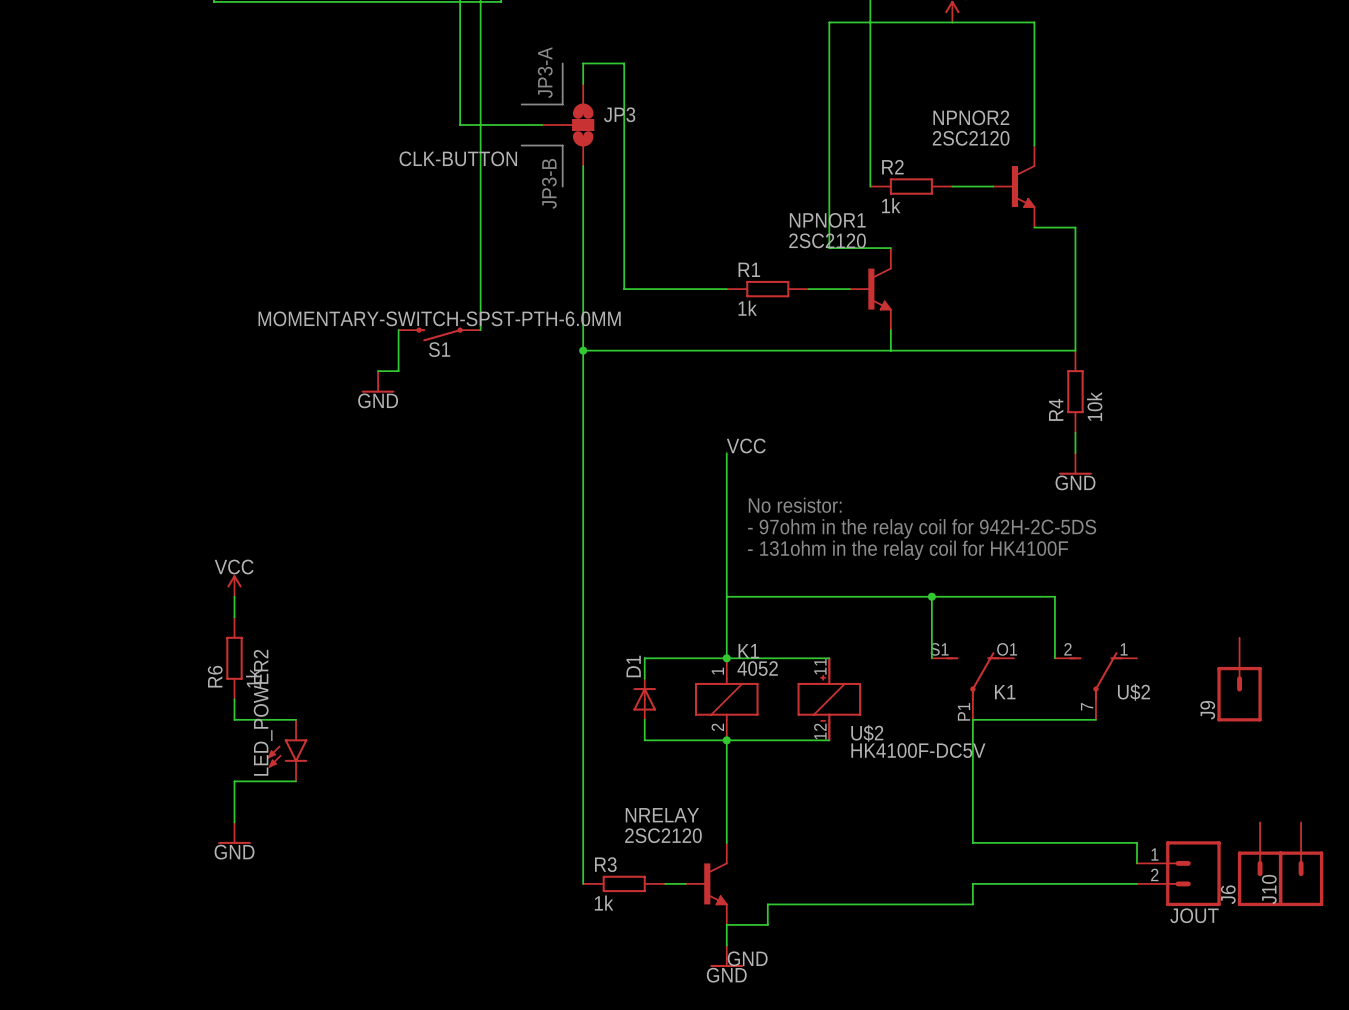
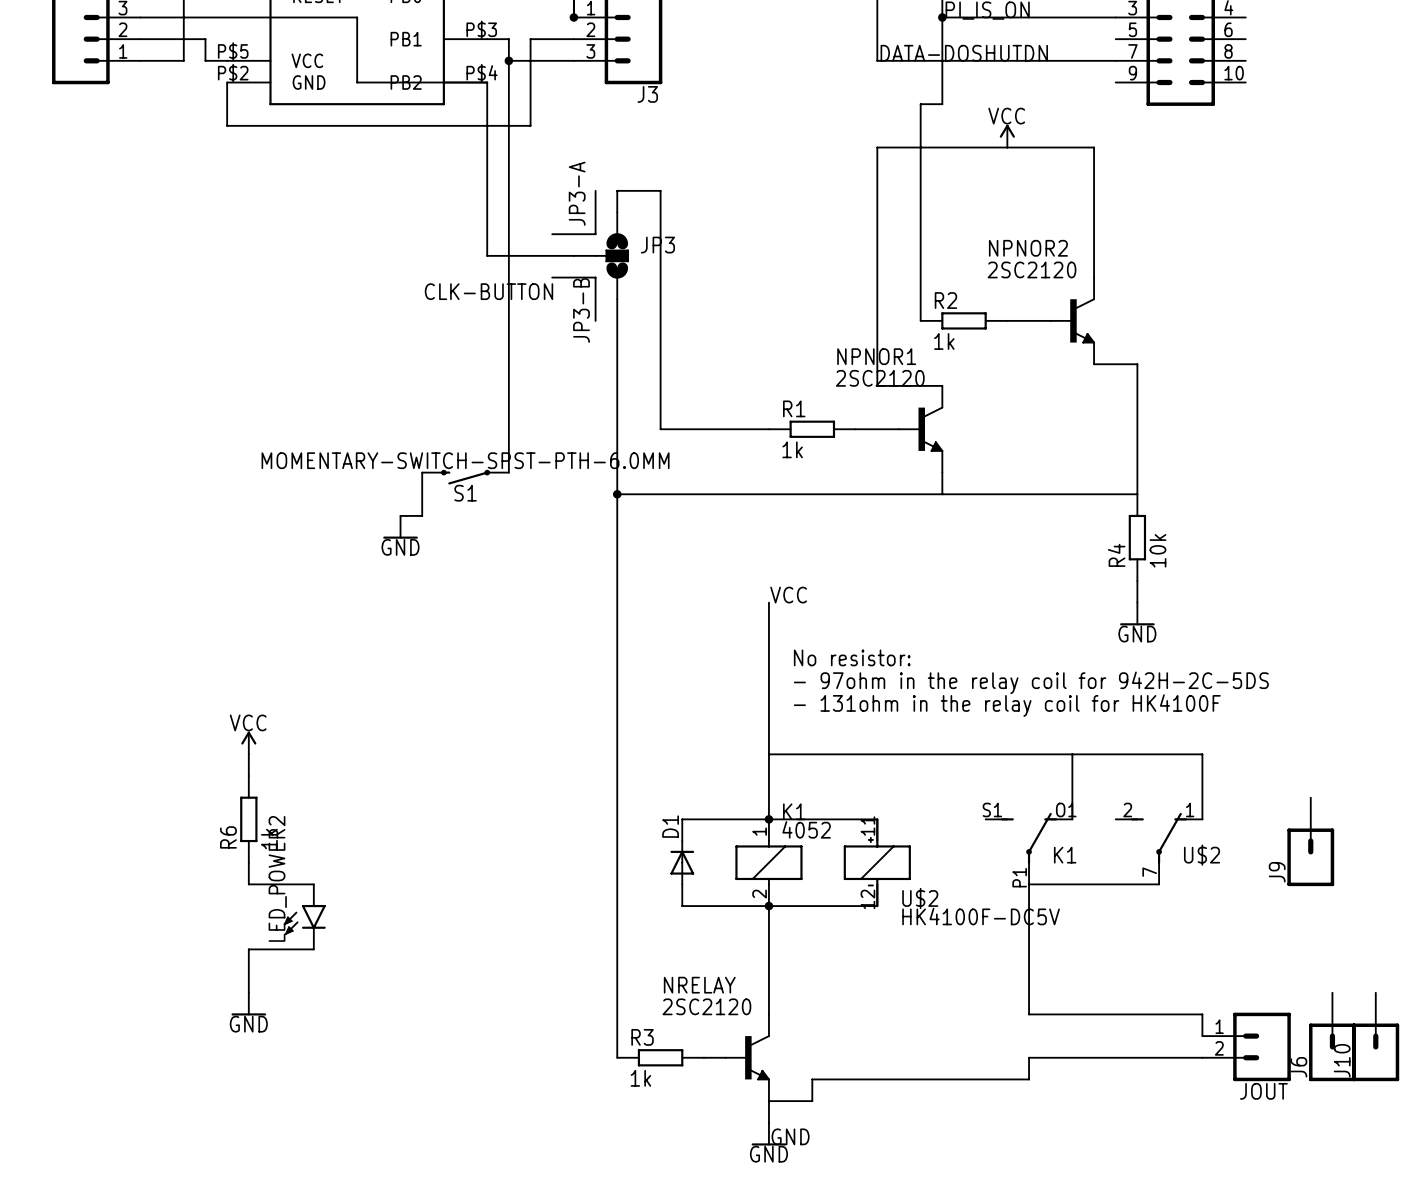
wire: (931, 596) (931, 658) -> (1072, 754) (1072, 819)
junction: (931, 596) -> none
wire: (1054, 596) (1054, 658) -> (1115, 754) (1202, 754) (1202, 819)

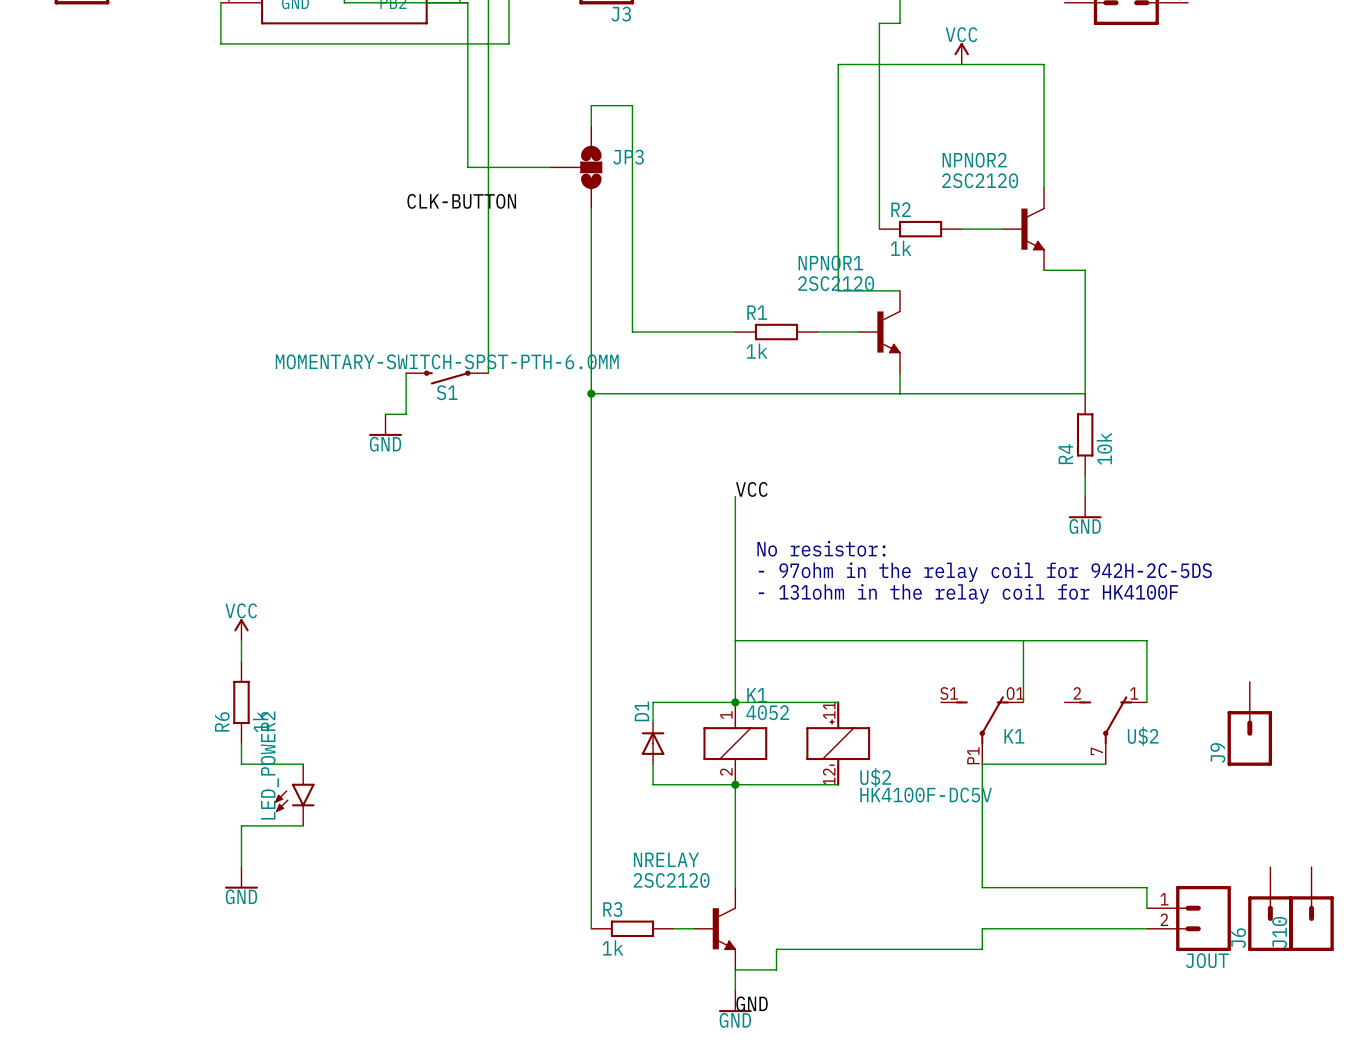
line: (595, 190) (595, 234) (552, 234) -> none
text: JP3-A (577, 193) -> none
line: (552, 277) (595, 277) (595, 320) -> none
text: JP3-B (581, 310) -> none

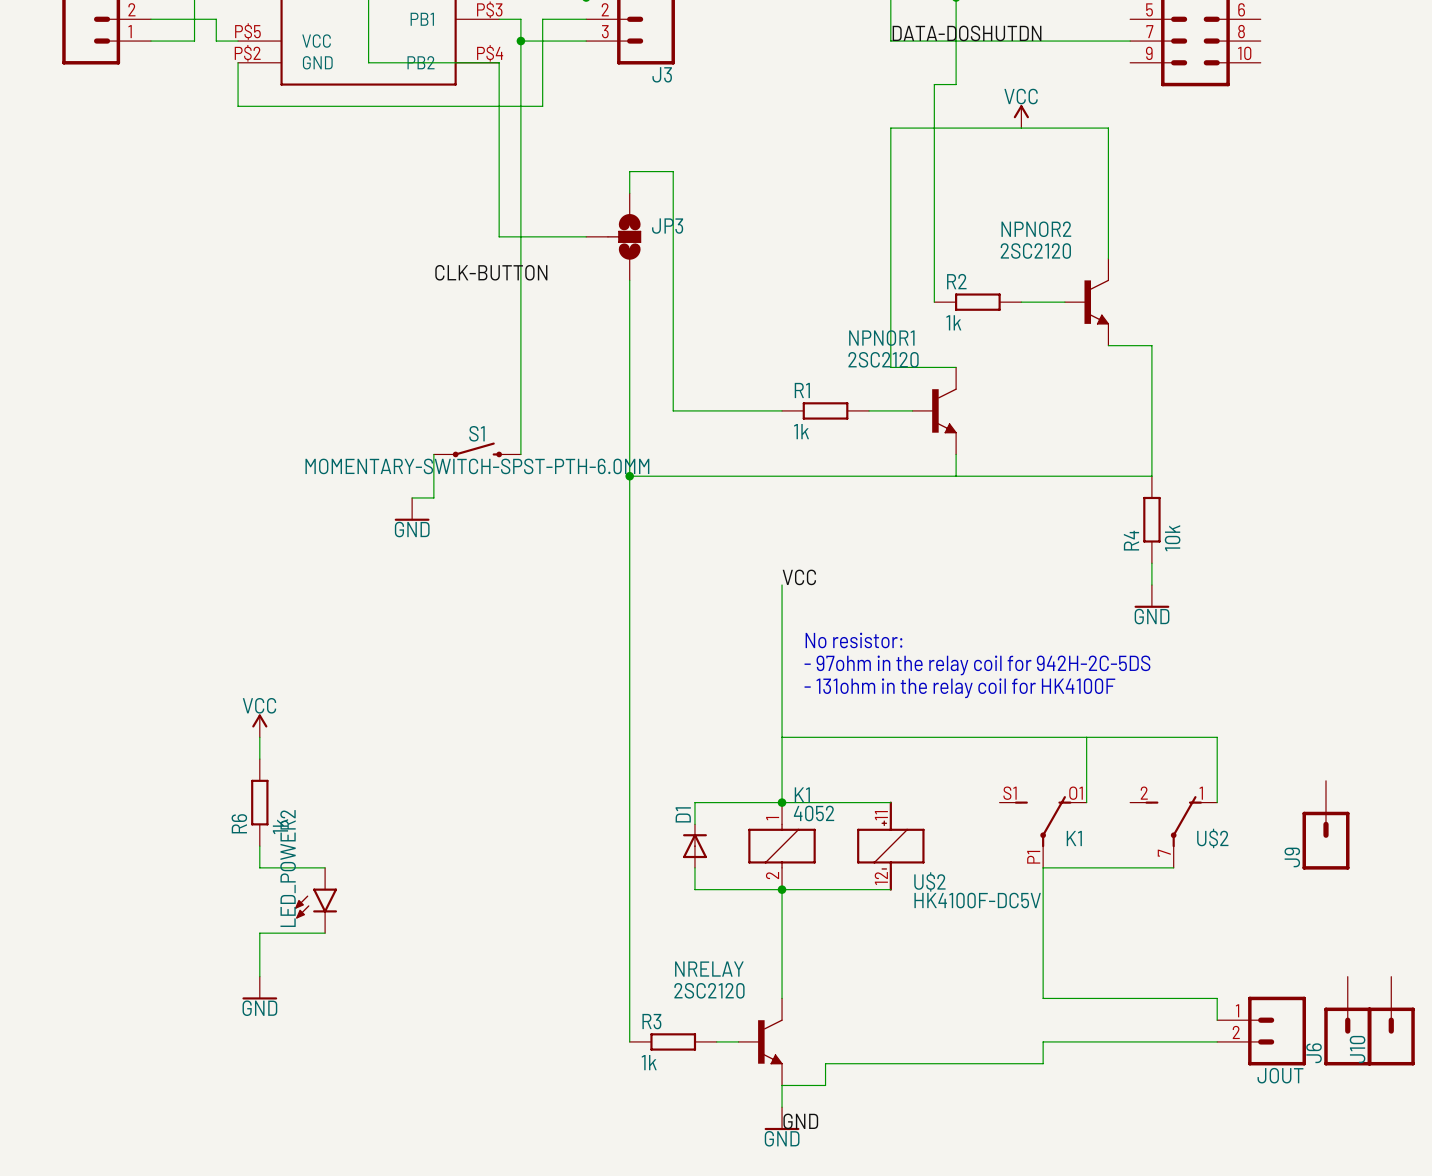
S1 rotation: 0° (447, 377) -> 180° (477, 449)

